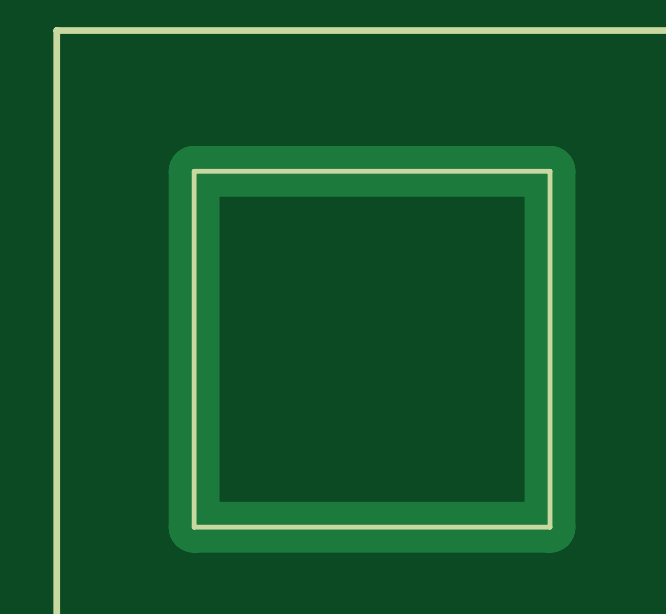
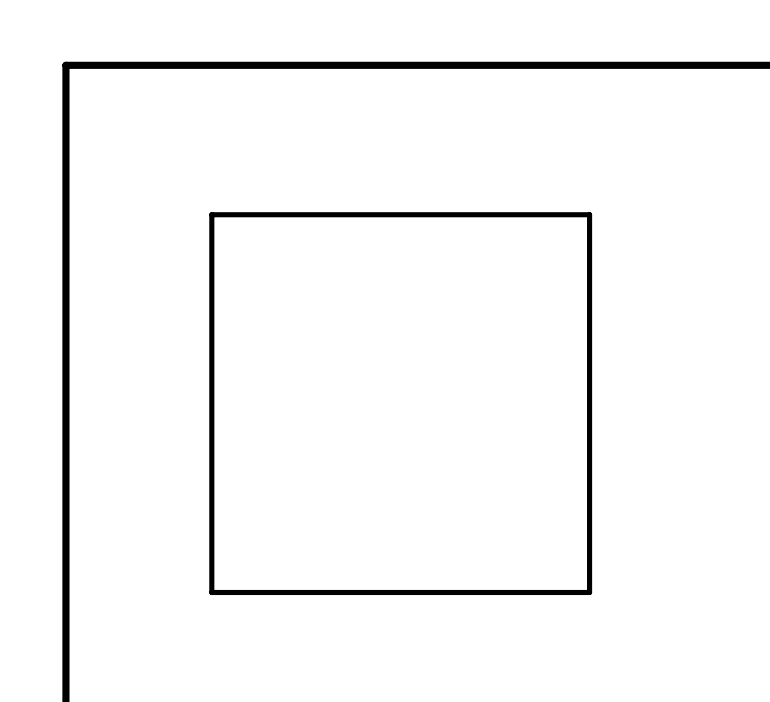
track: (194, 171) (550, 171) (550, 527) (194, 527) (194, 171) -> none

